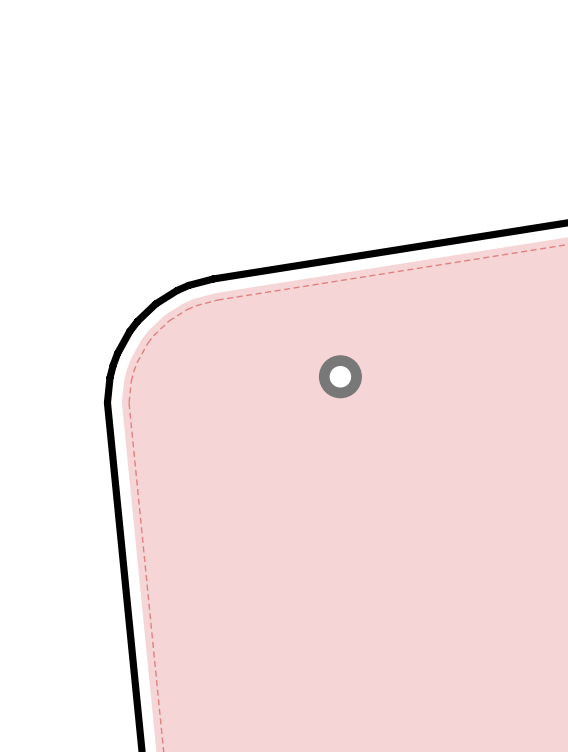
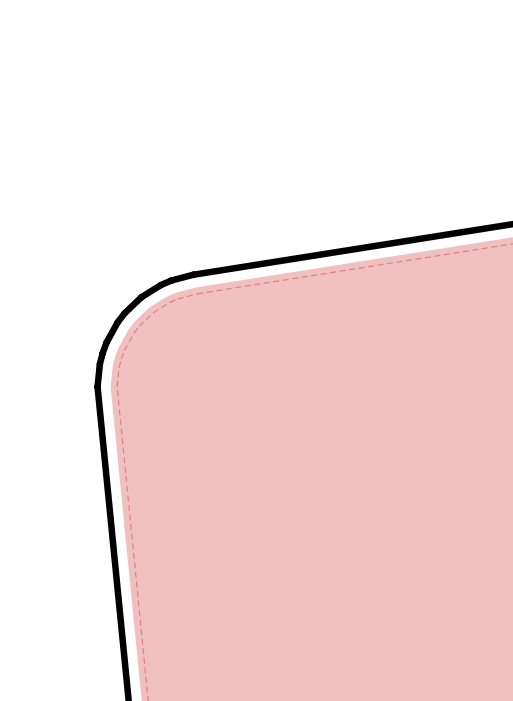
via: (340, 376) -> none

